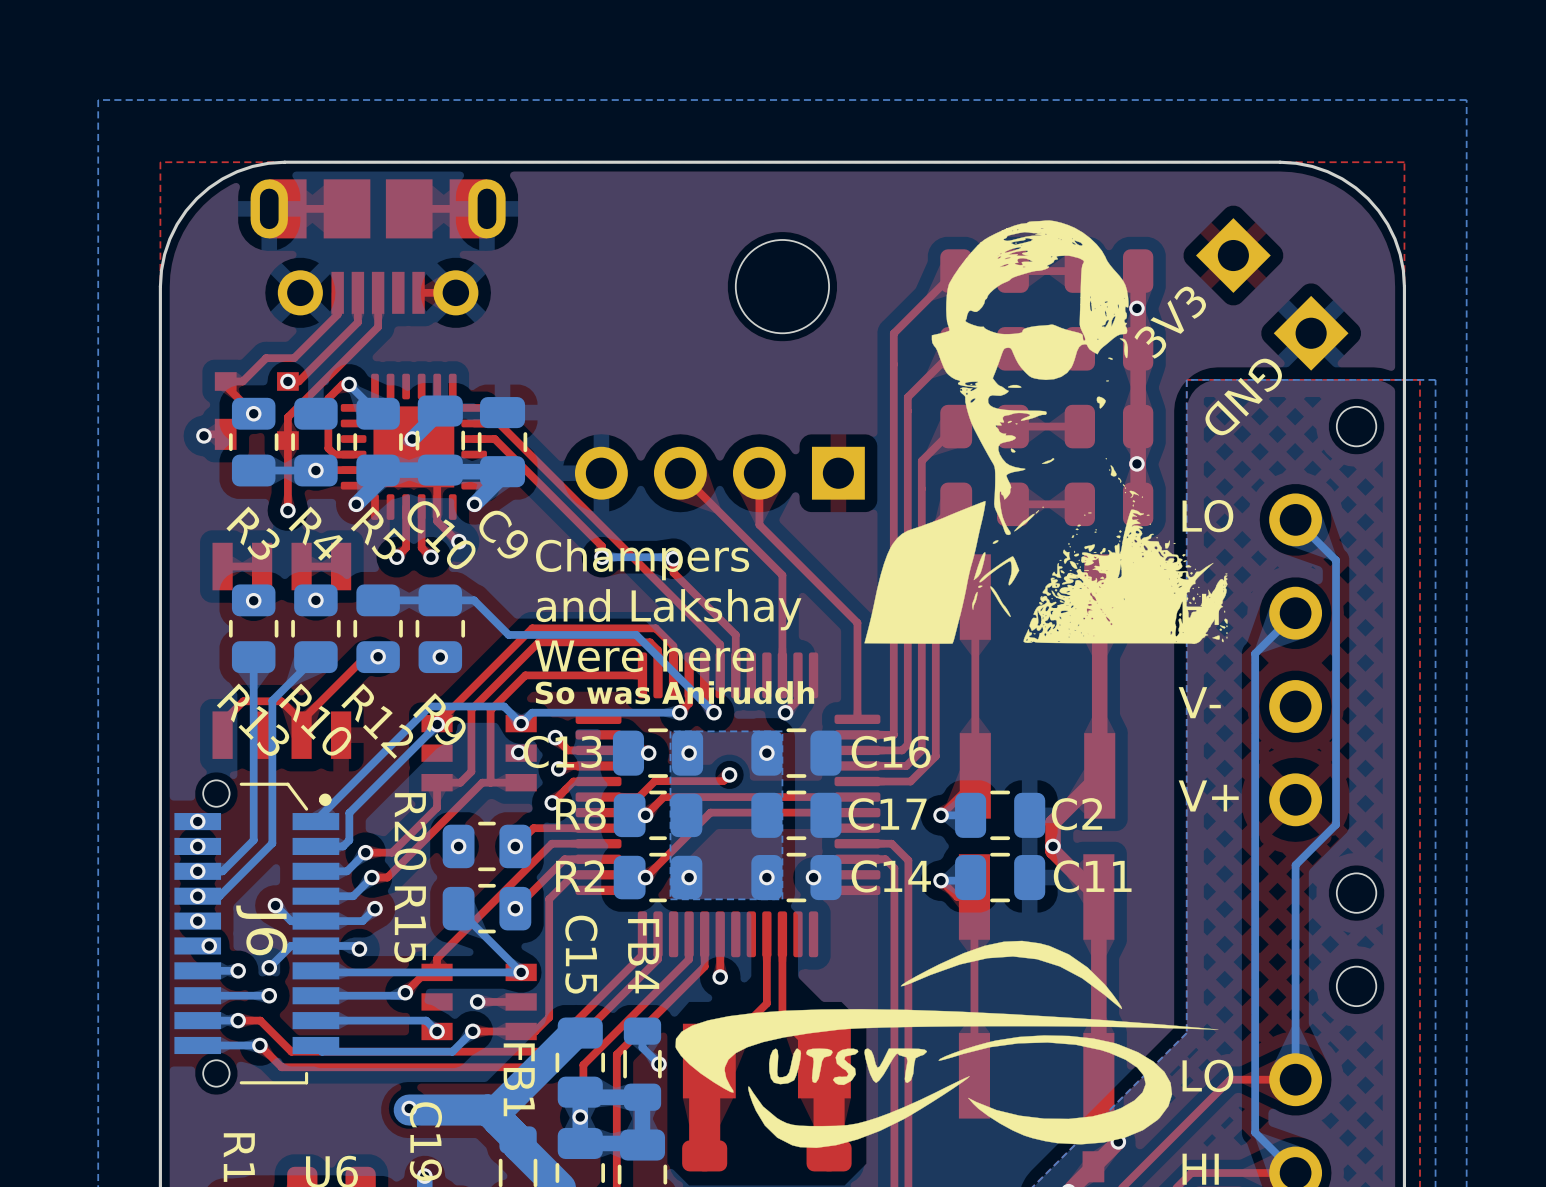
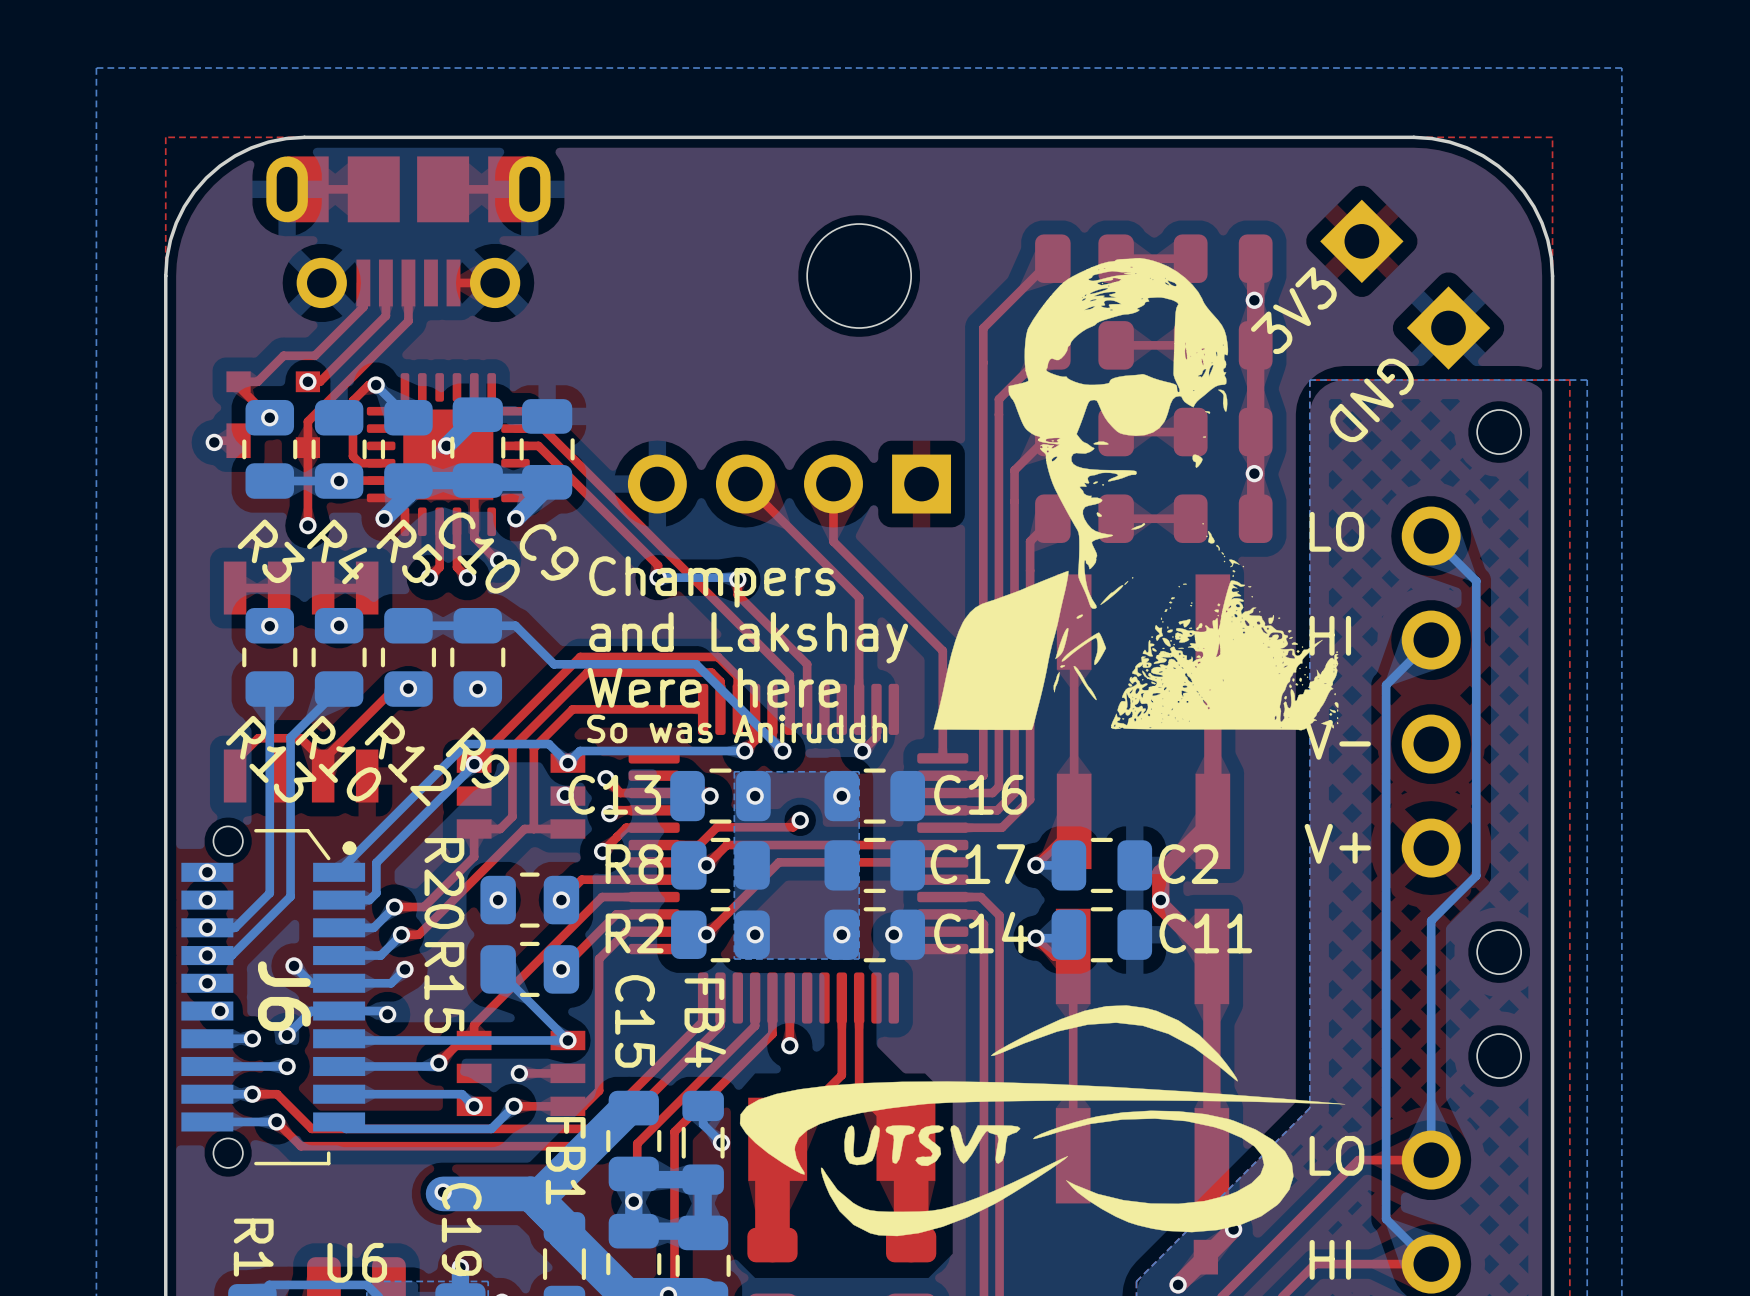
drawing position: (1046, 432) -> (1136, 494)

